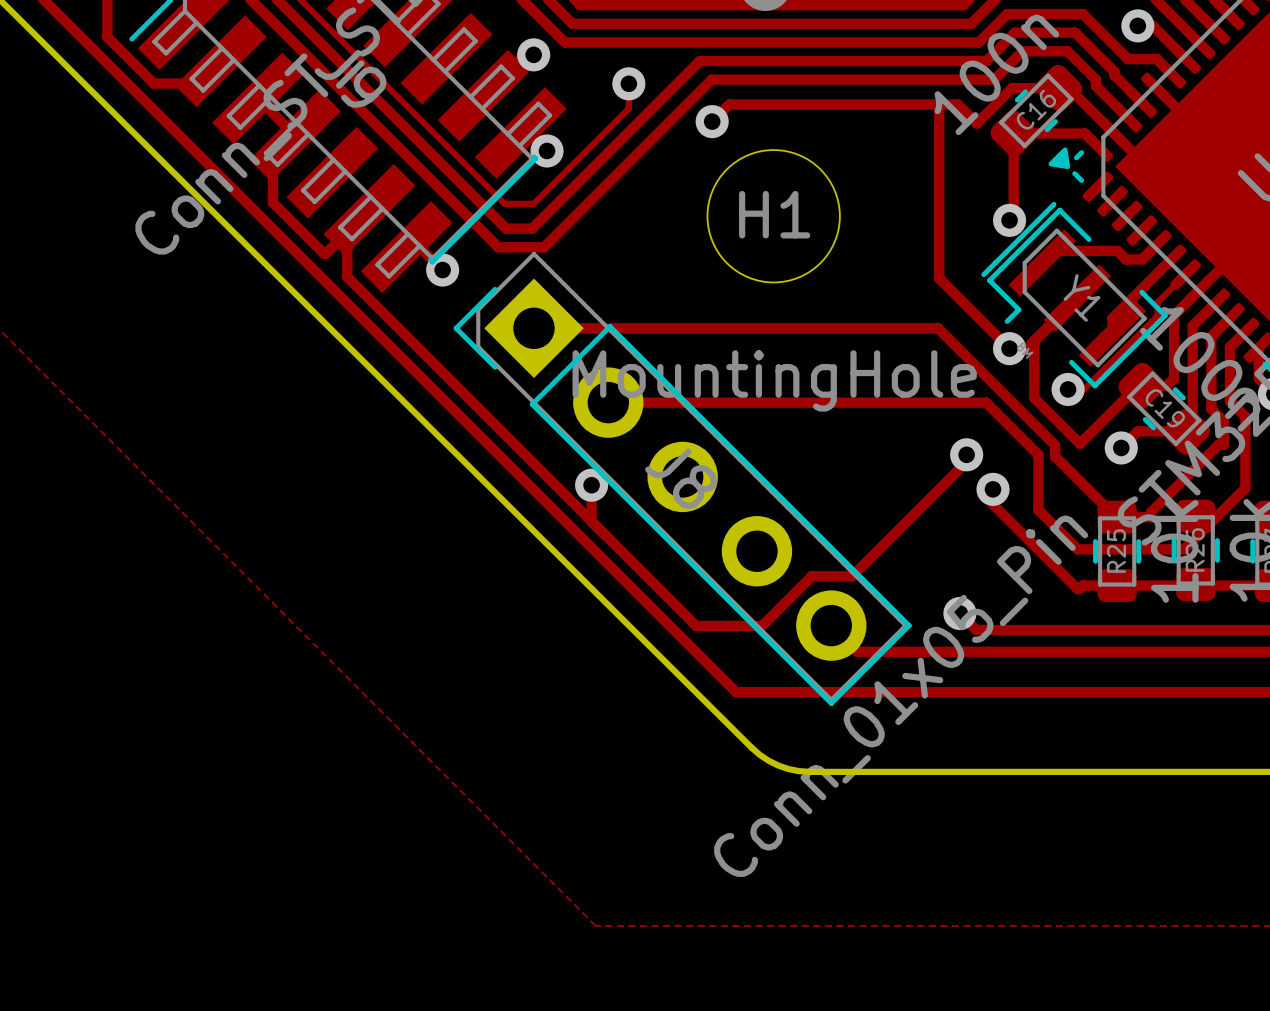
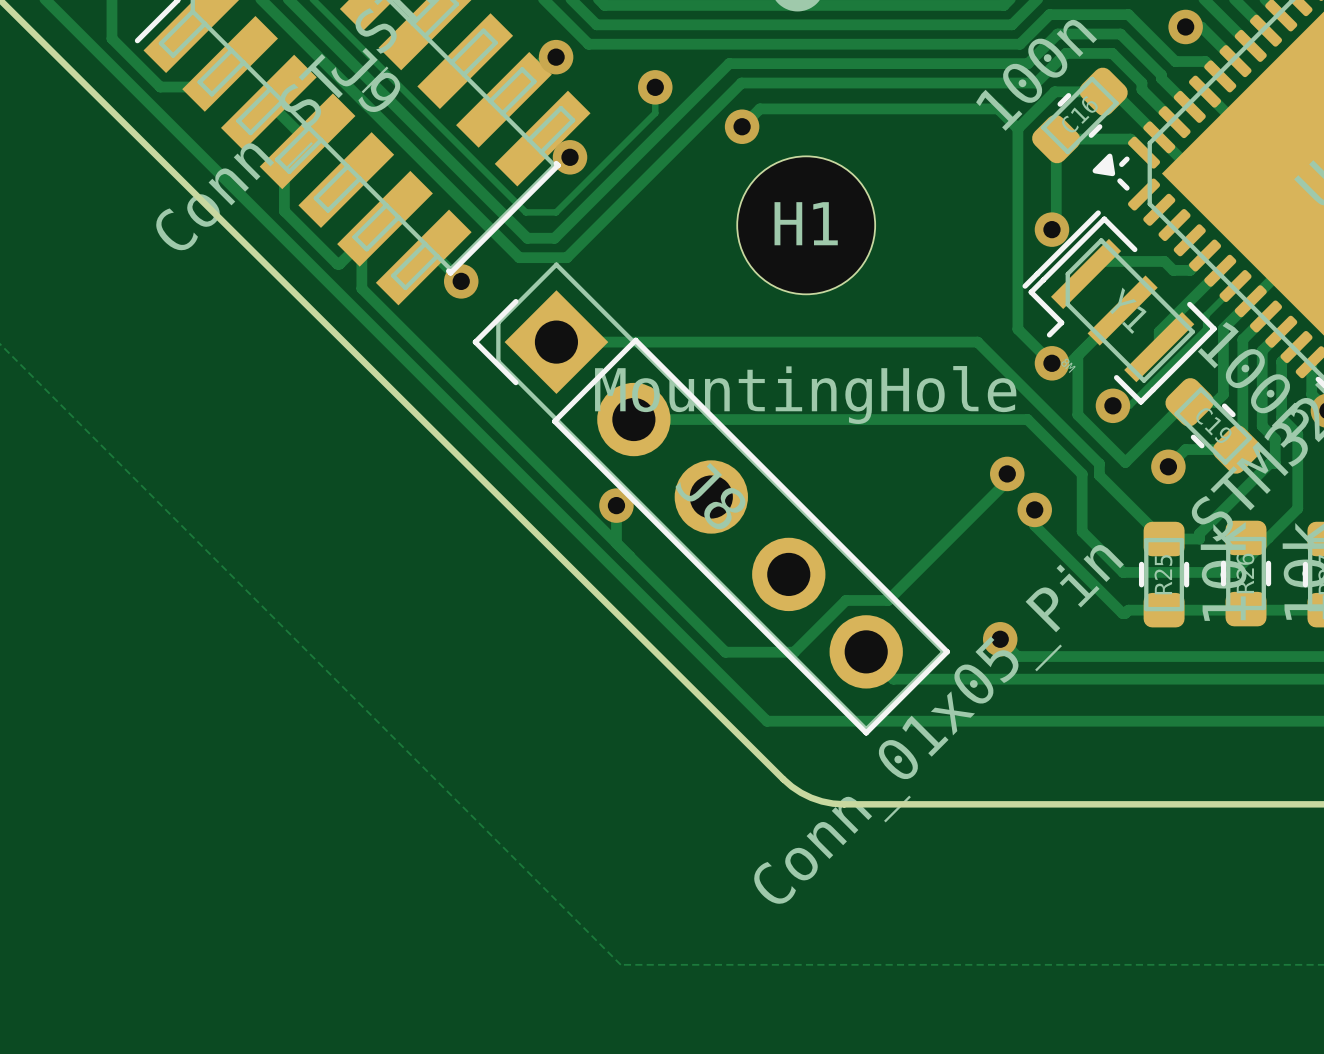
track: (939, 104) (939, 278) (976, 315) -> (1017, 128) (1017, 329)

